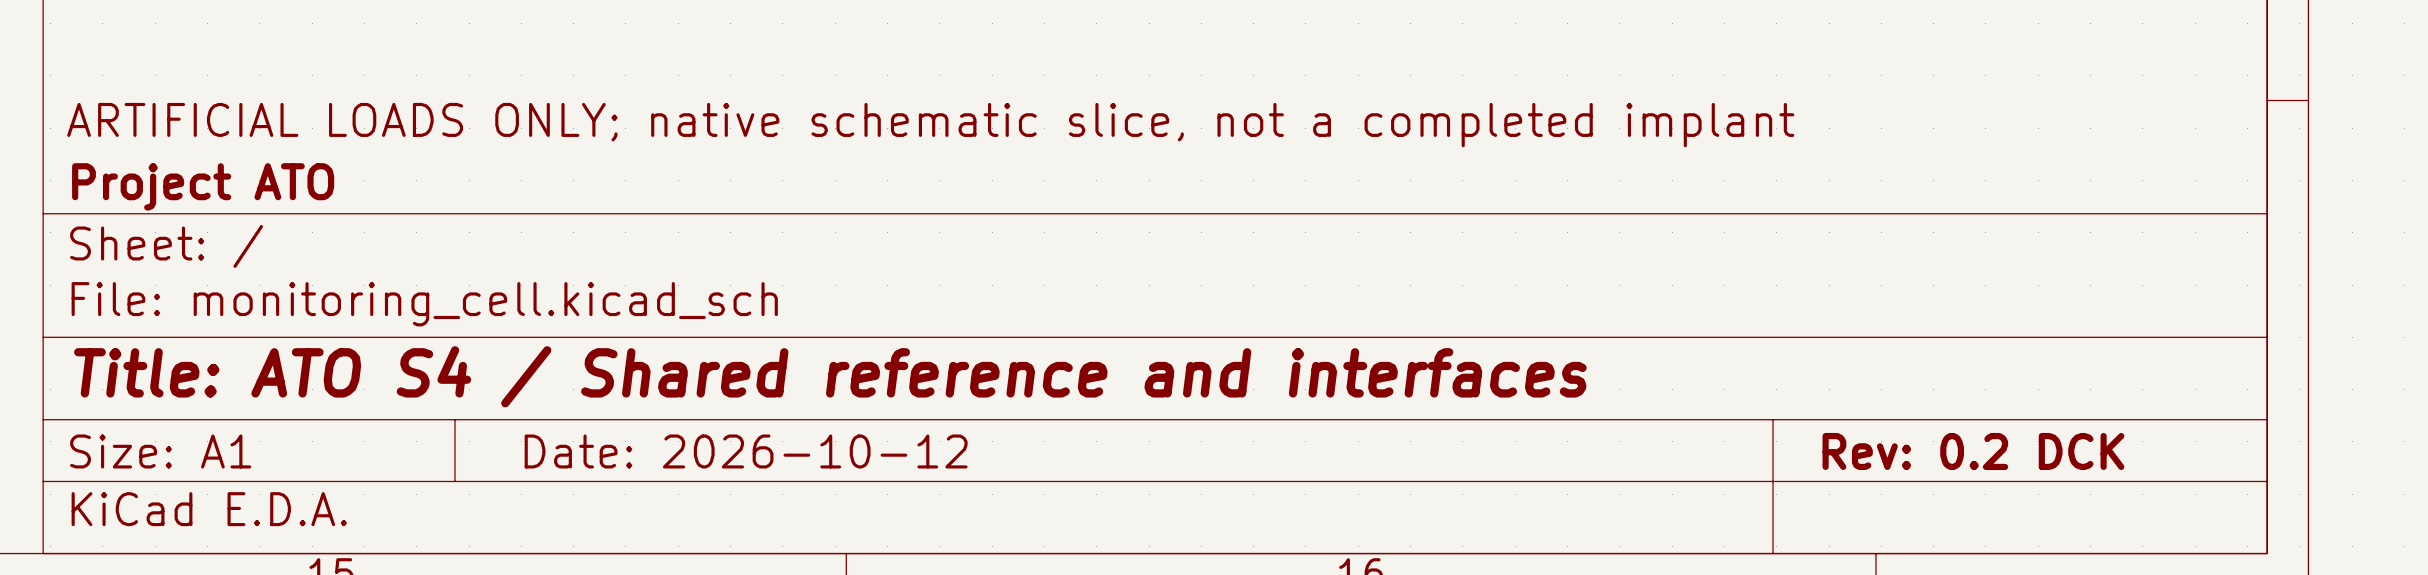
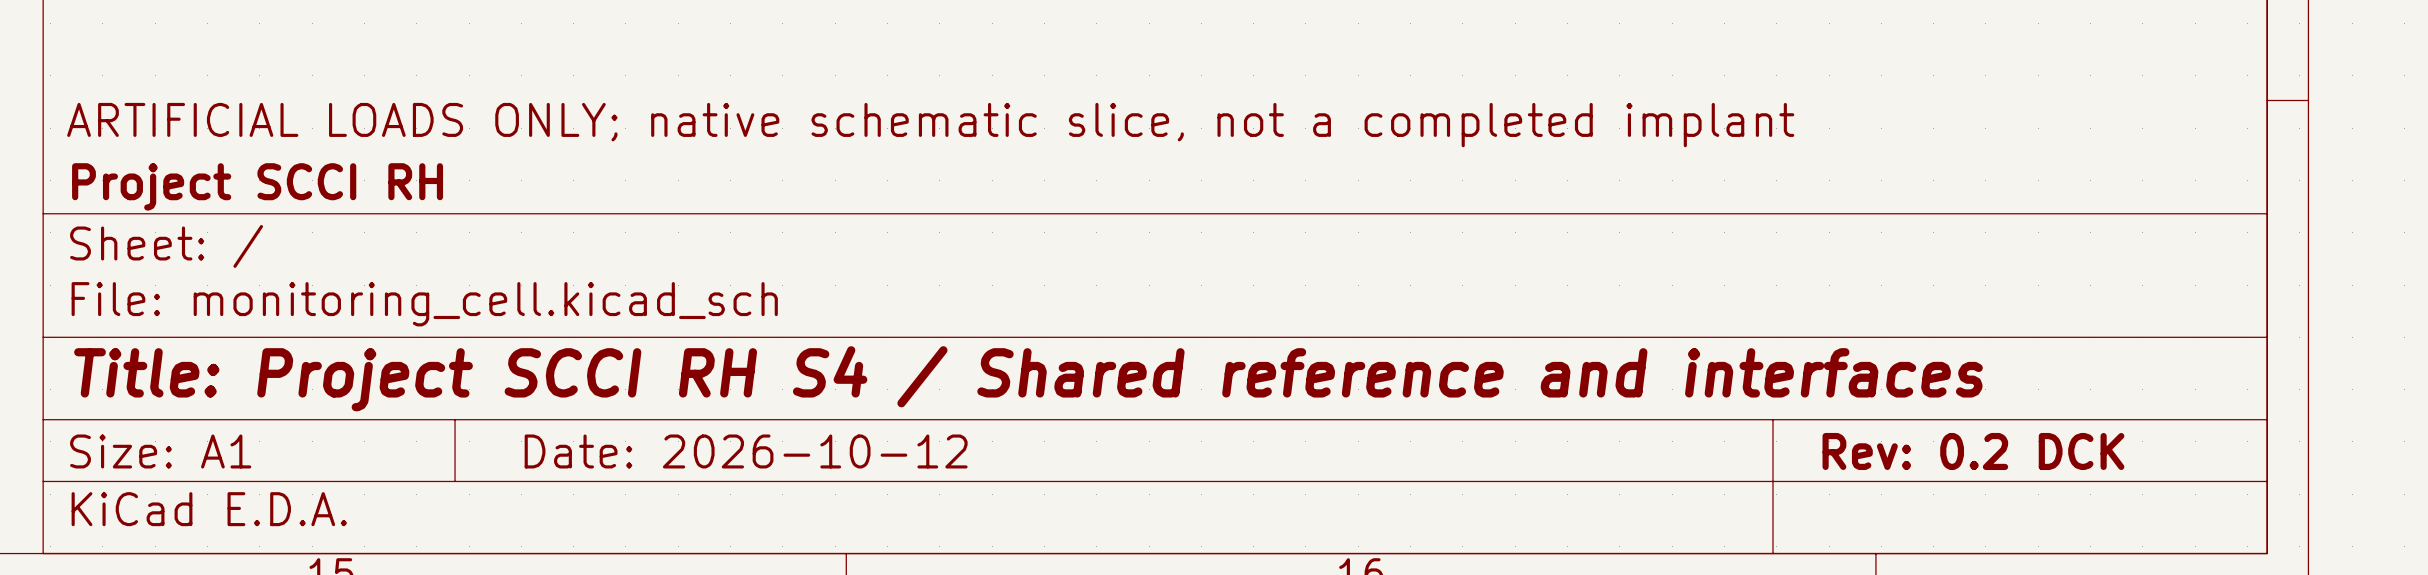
title block: Project ATO (203, 186) -> Project SCCI RH (257, 186)
title block: Title: ATO S4 / Shared reference and interfaces (830, 376) -> Title: Project SCCI RH S4 / Shared reference and interfaces (1028, 378)

